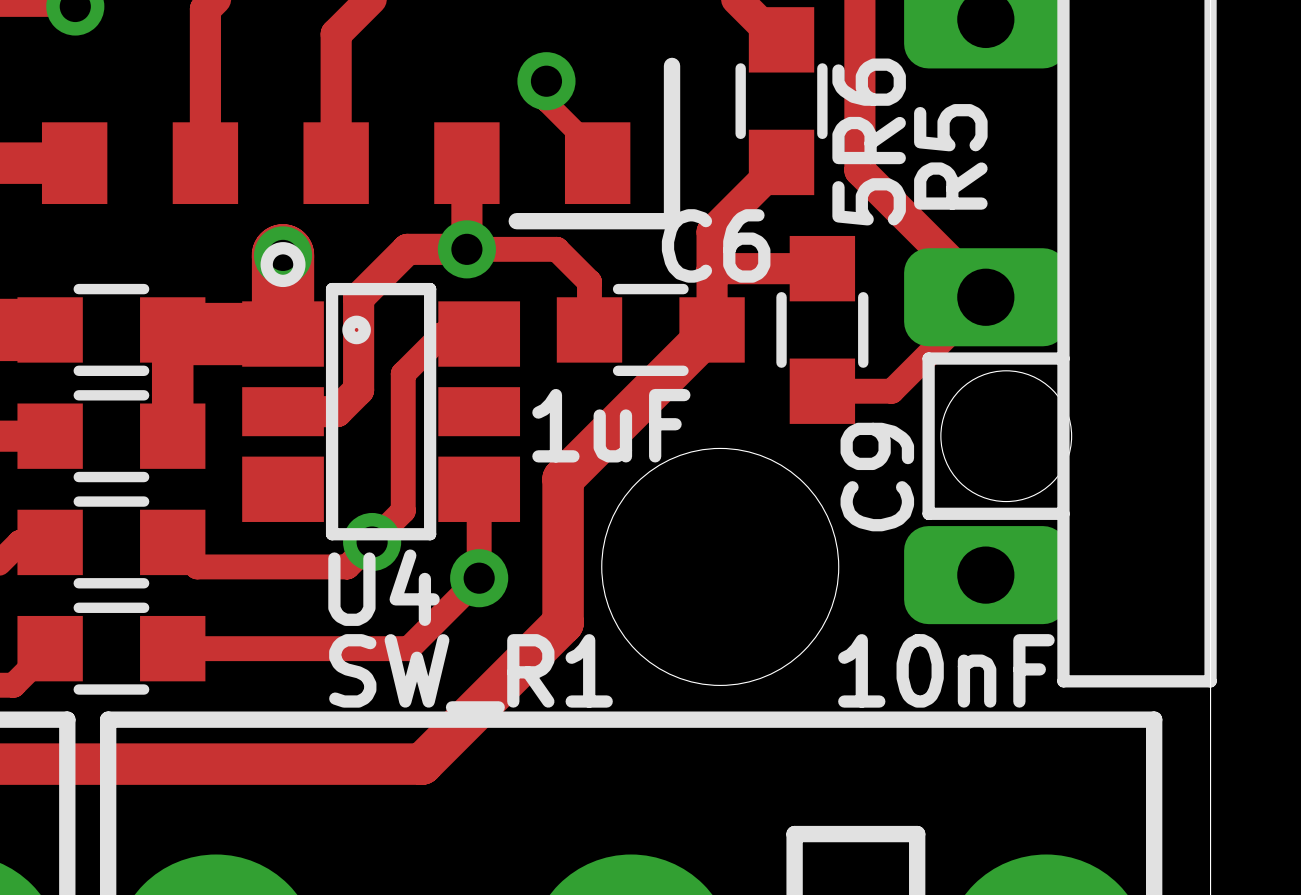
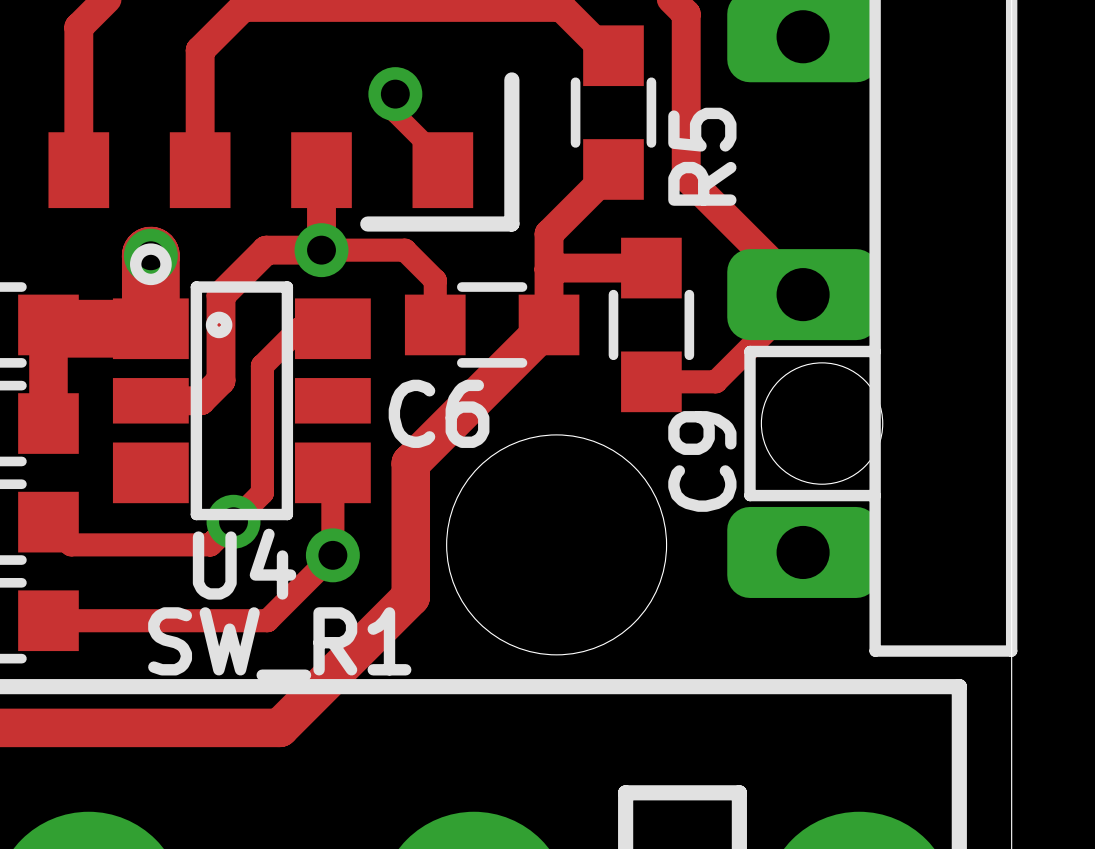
R5 value: 5R6 (869, 141) -> none
R5 name position: R5 (950, 156) -> R5 (702, 156)
C6 name position: C6 (716, 245) -> C6 (439, 413)
C6 value: 1uF (611, 425) -> none
C9 value: 10nF (946, 670) -> none
SW_R1 name position: SW_R1 (470, 673) -> SW_R1 (279, 644)

